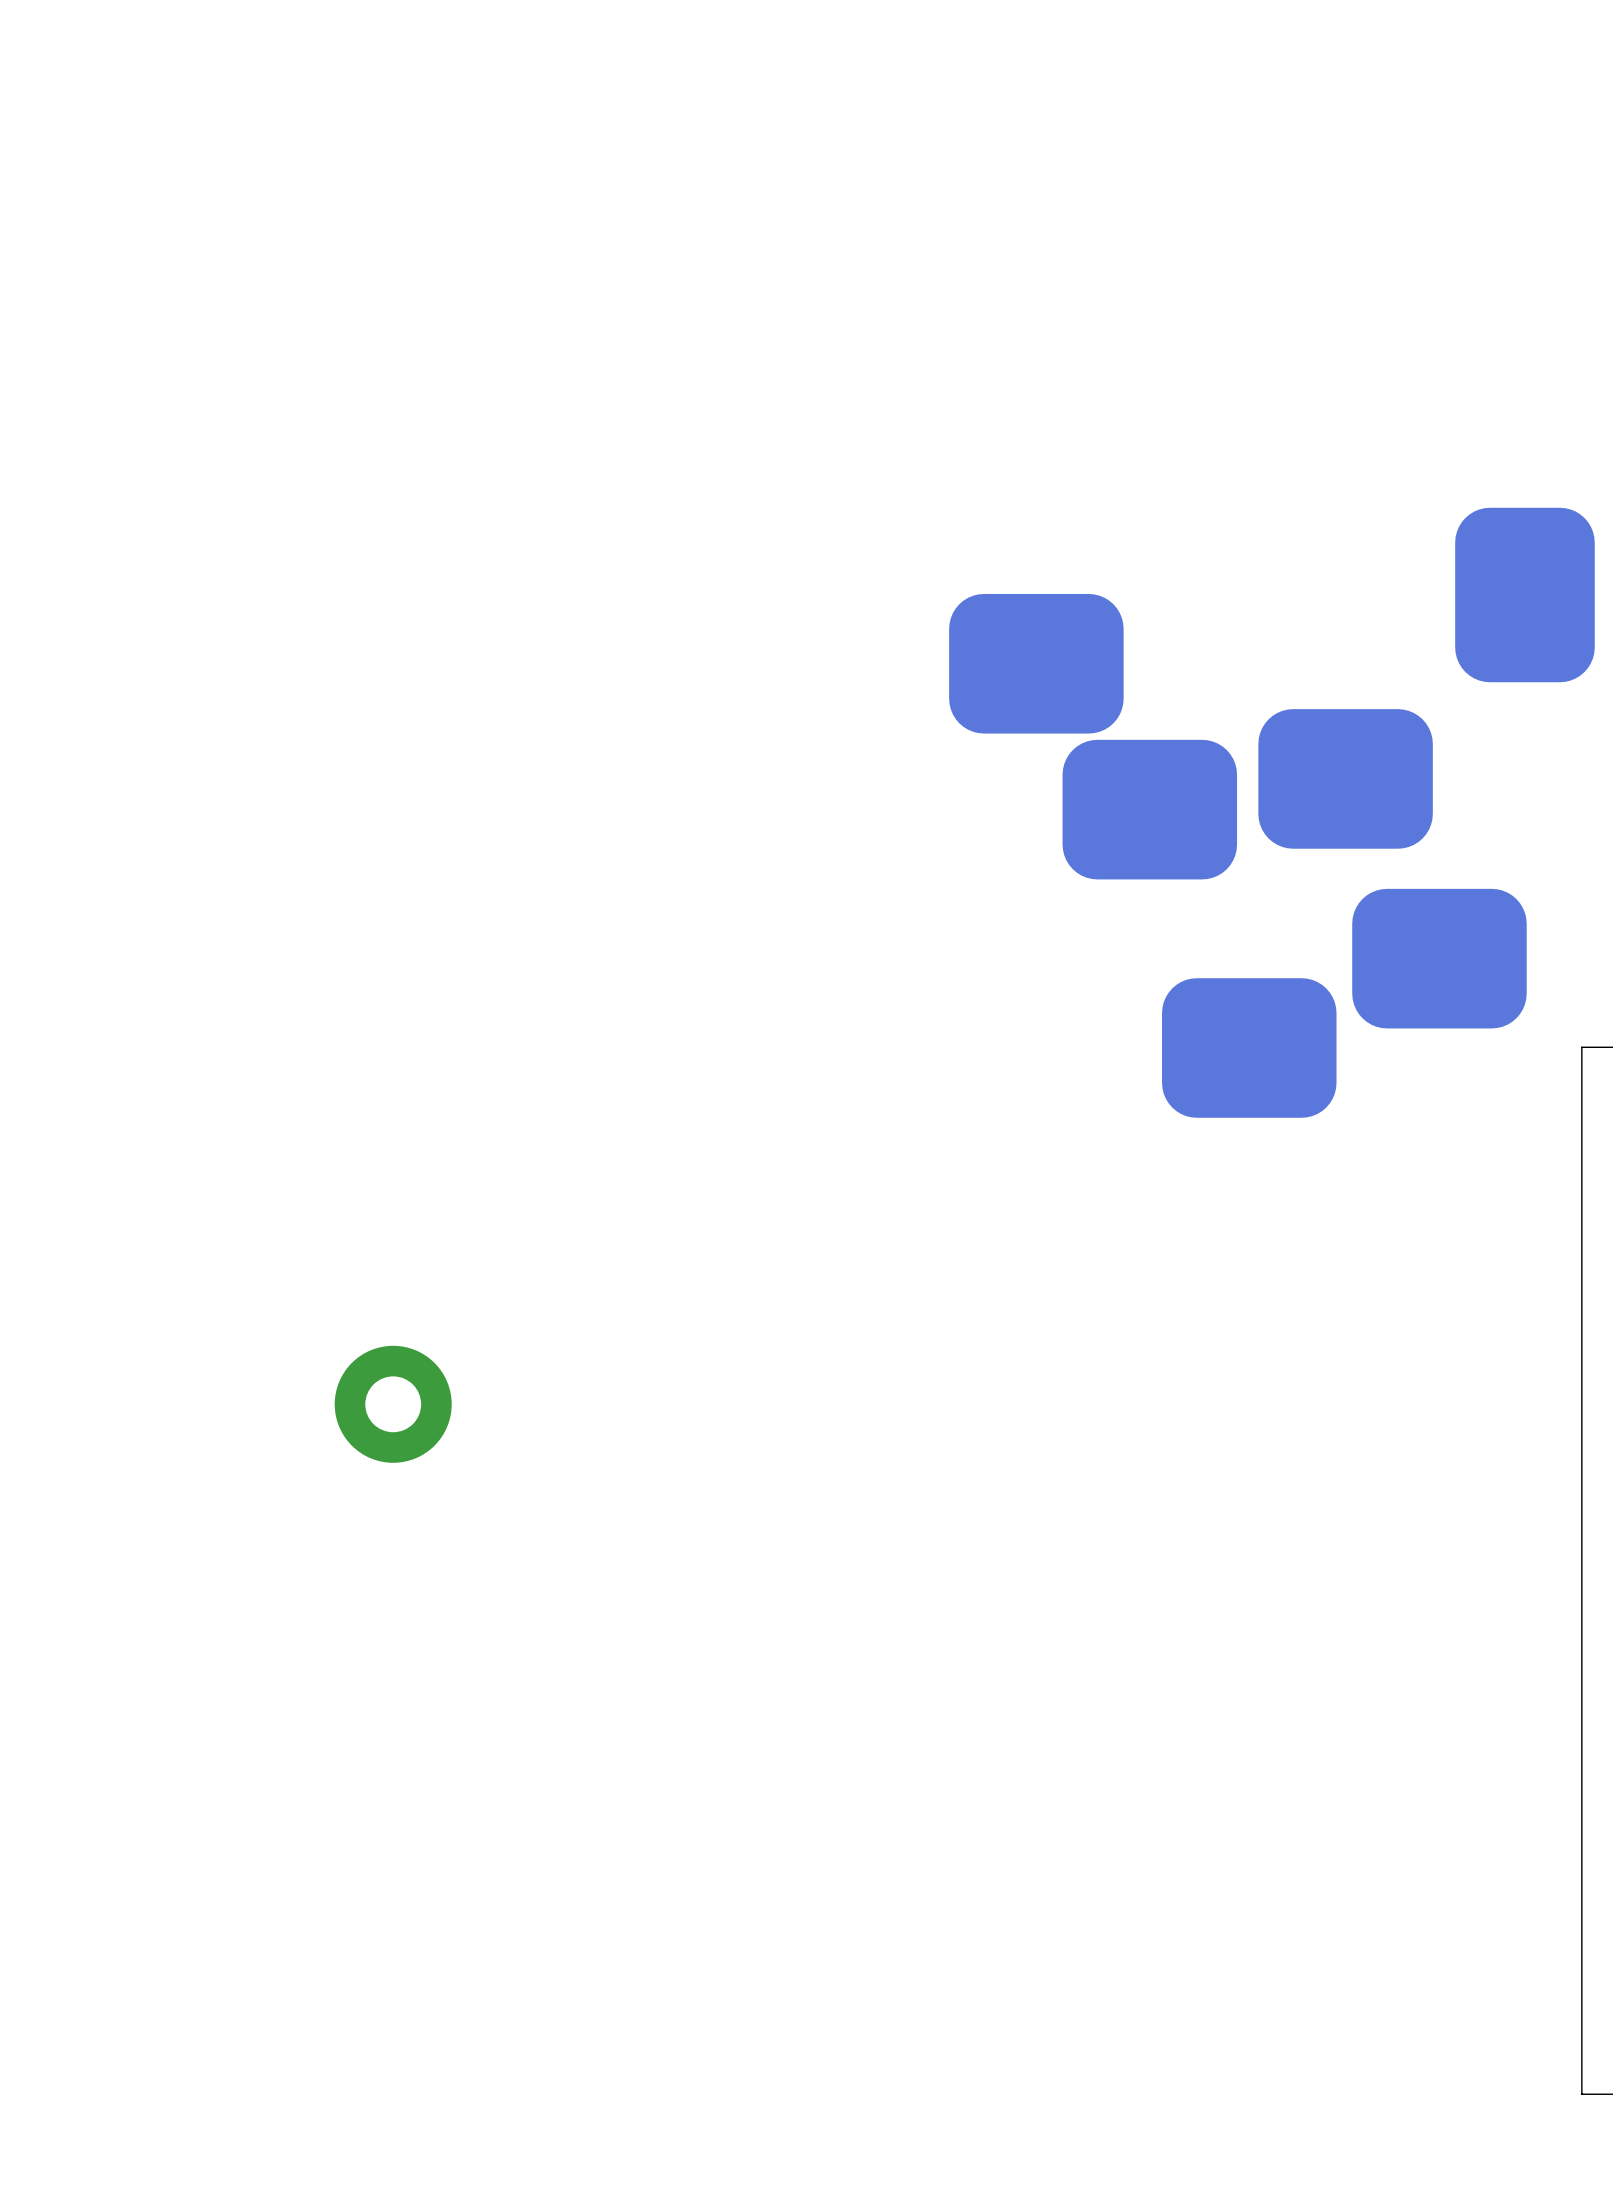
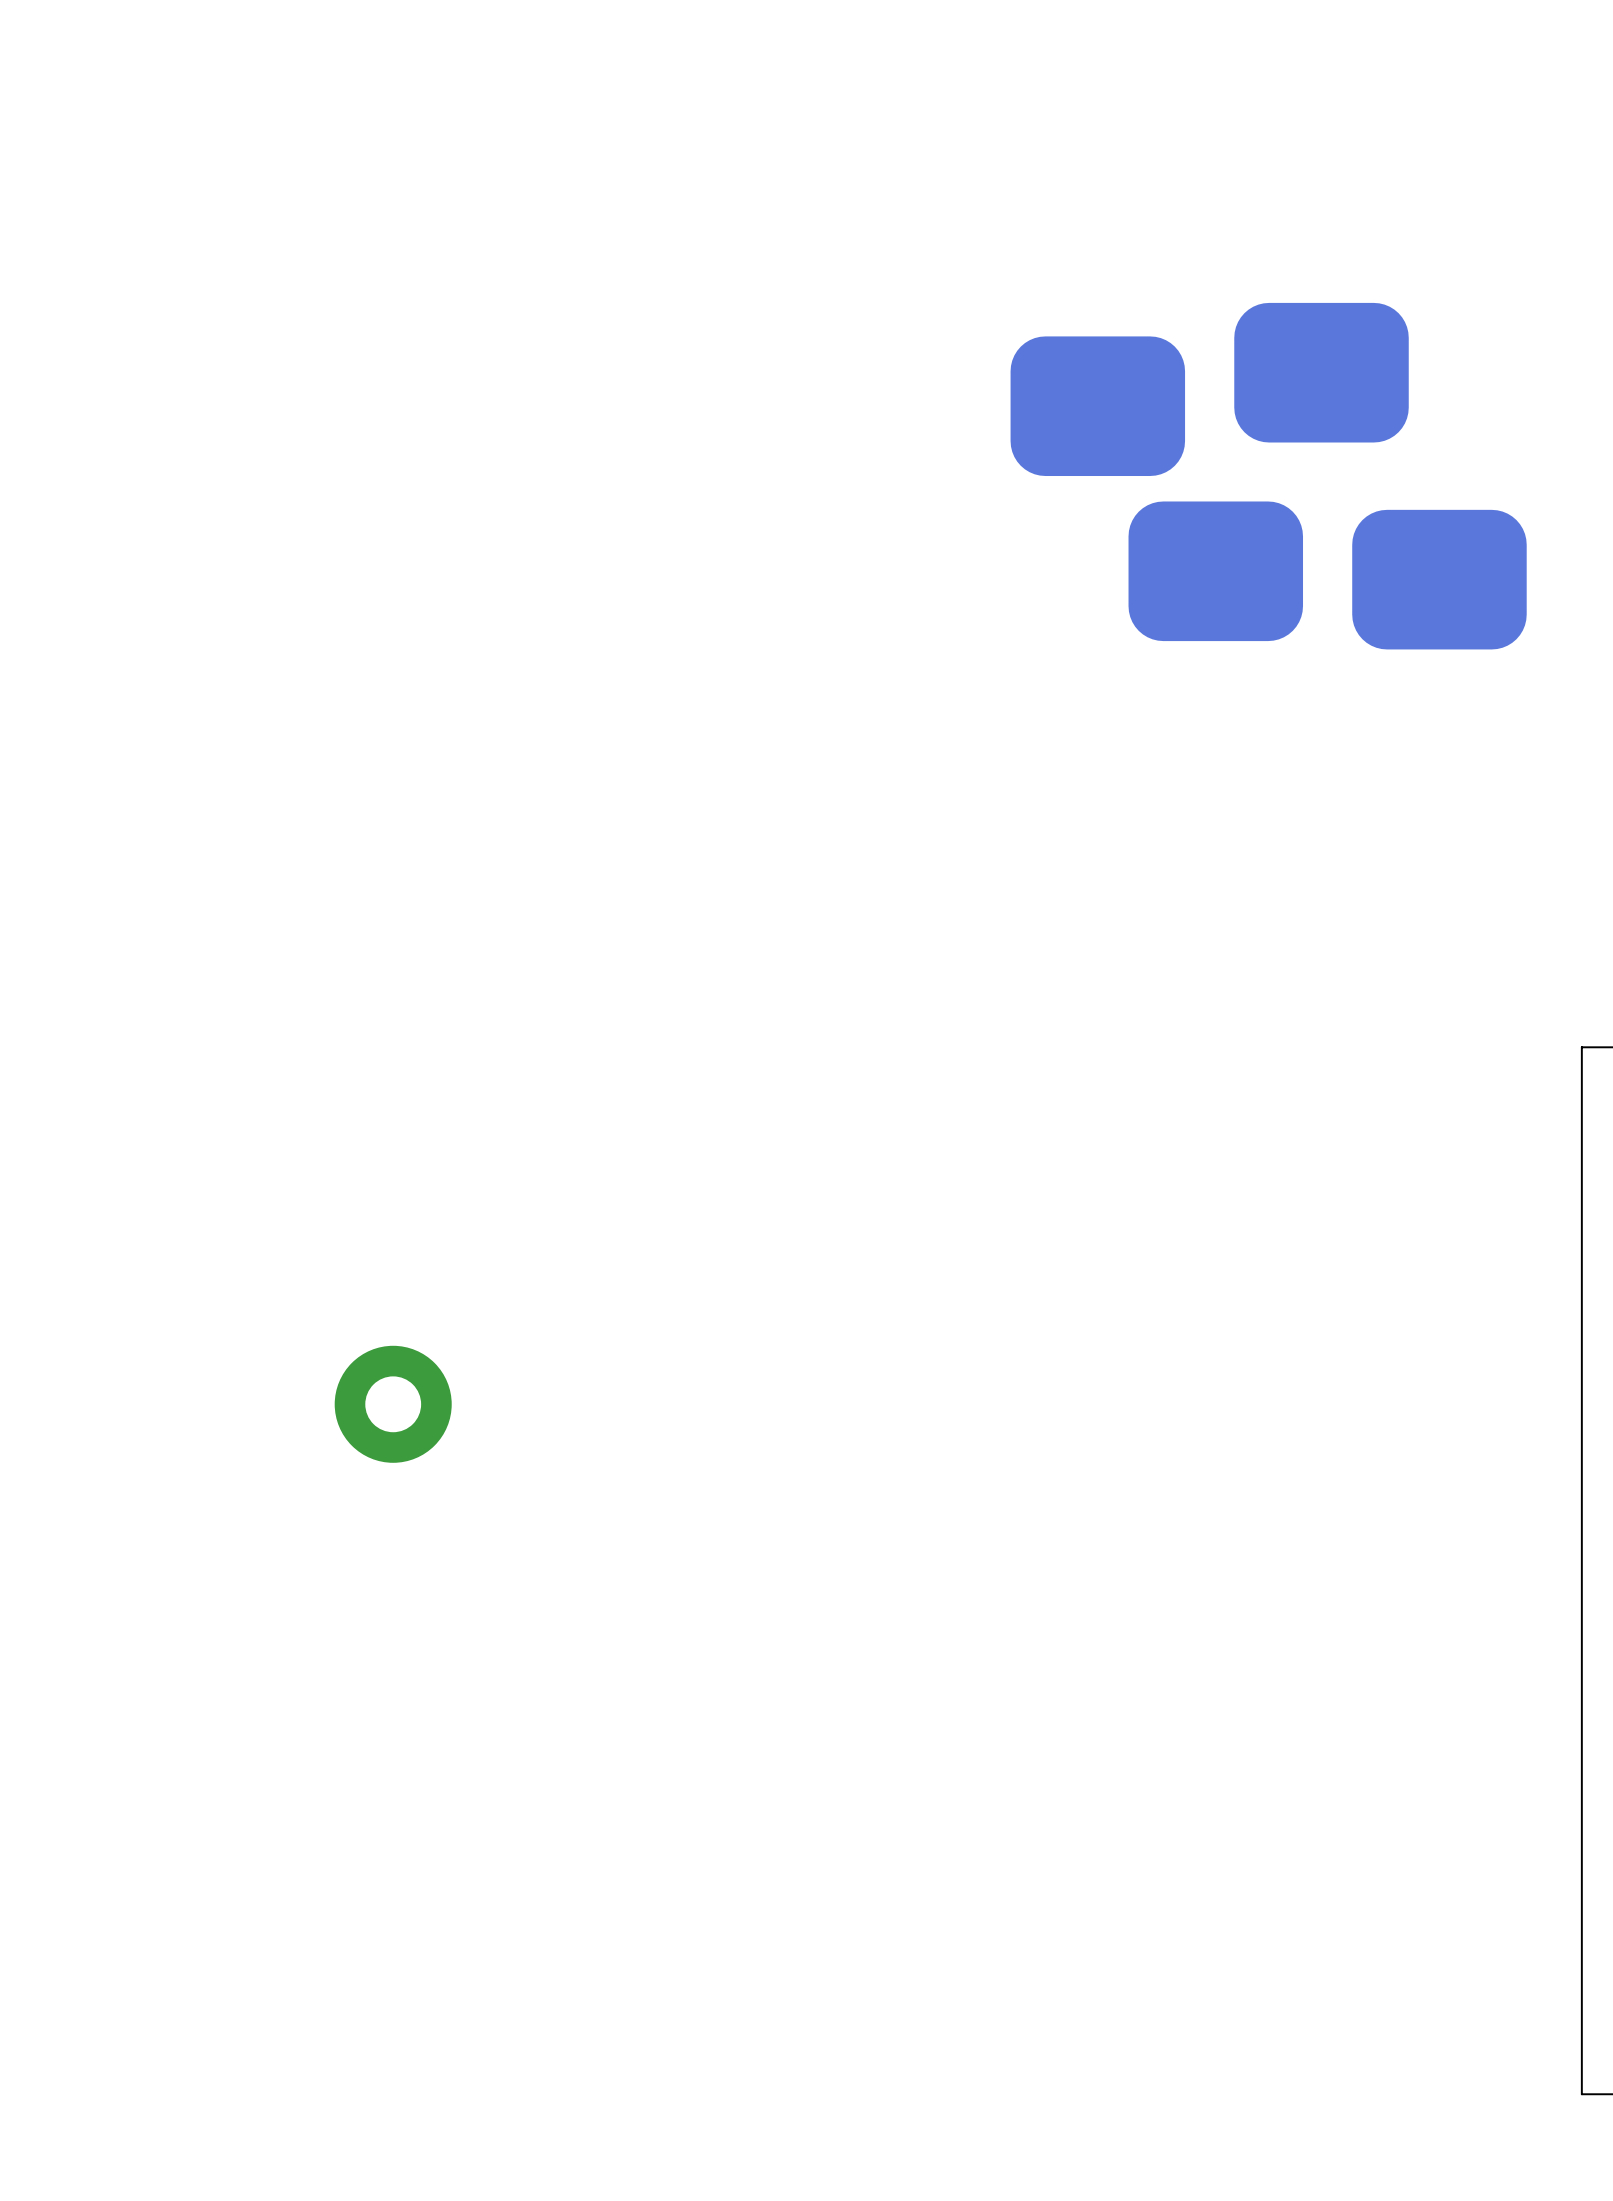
part: none -> (1321, 372)
part: none -> (1097, 406)
part: none -> (1215, 571)
part rotation: 0° (1524, 595) -> 90° clockwise (1439, 579)
part: (1036, 663) -> none
part: (1345, 778) -> none
part: (1149, 809) -> none
part: (1439, 958) -> none
part: (1249, 1047) -> none

